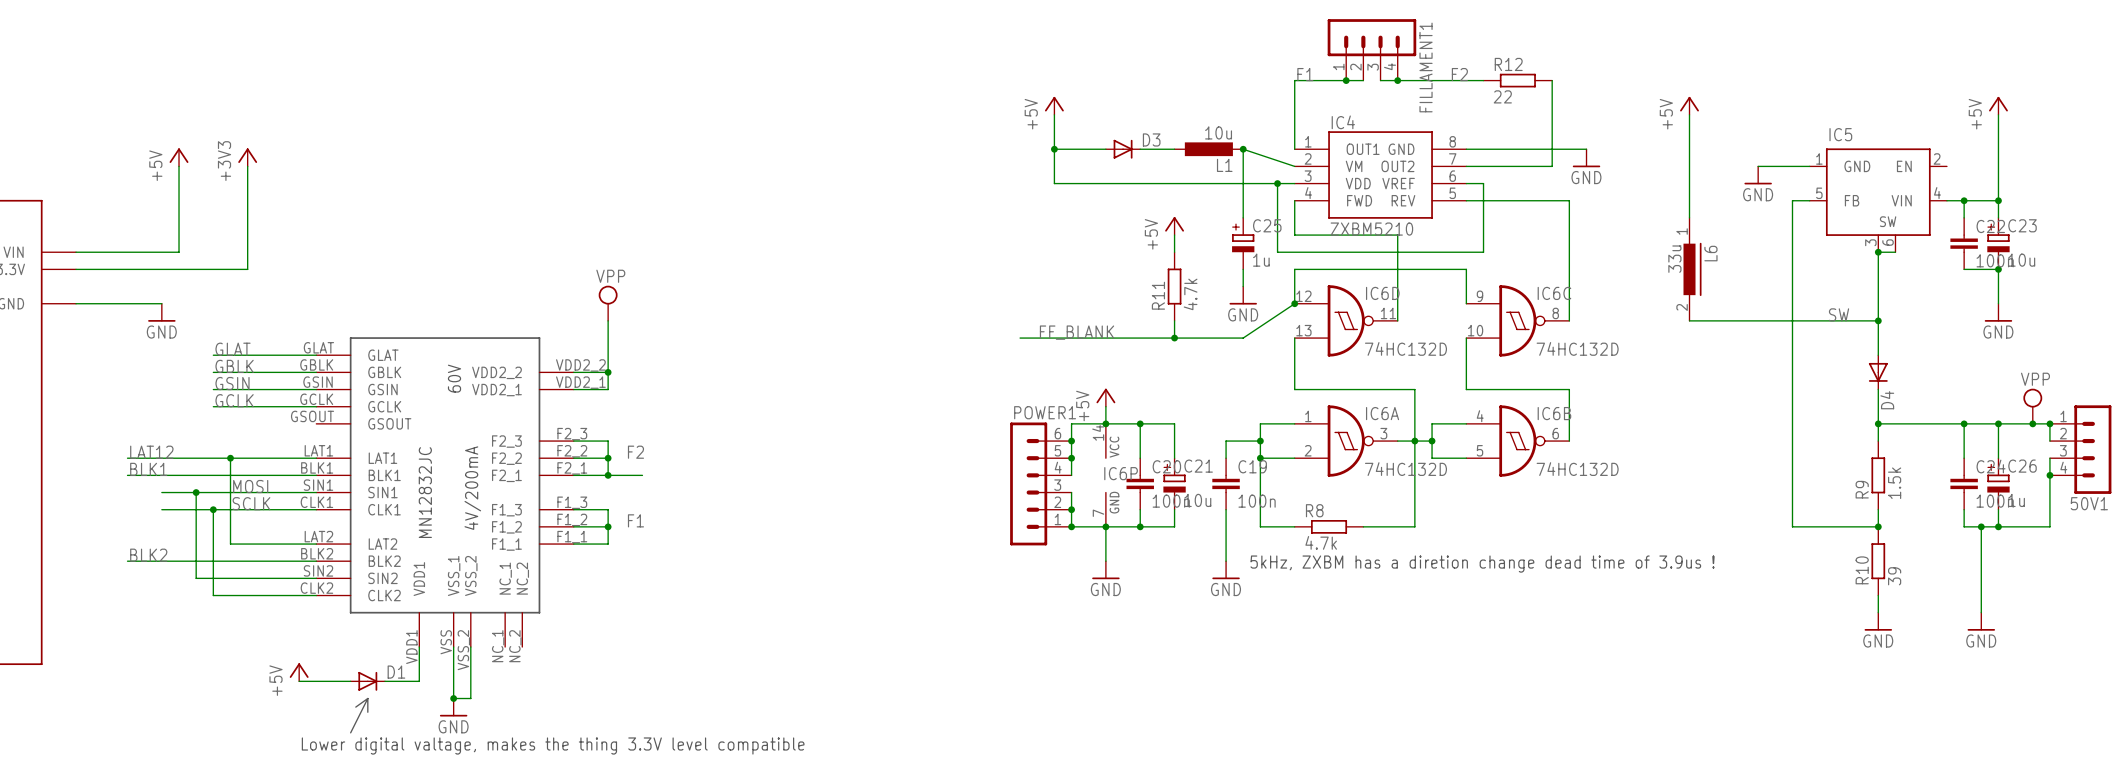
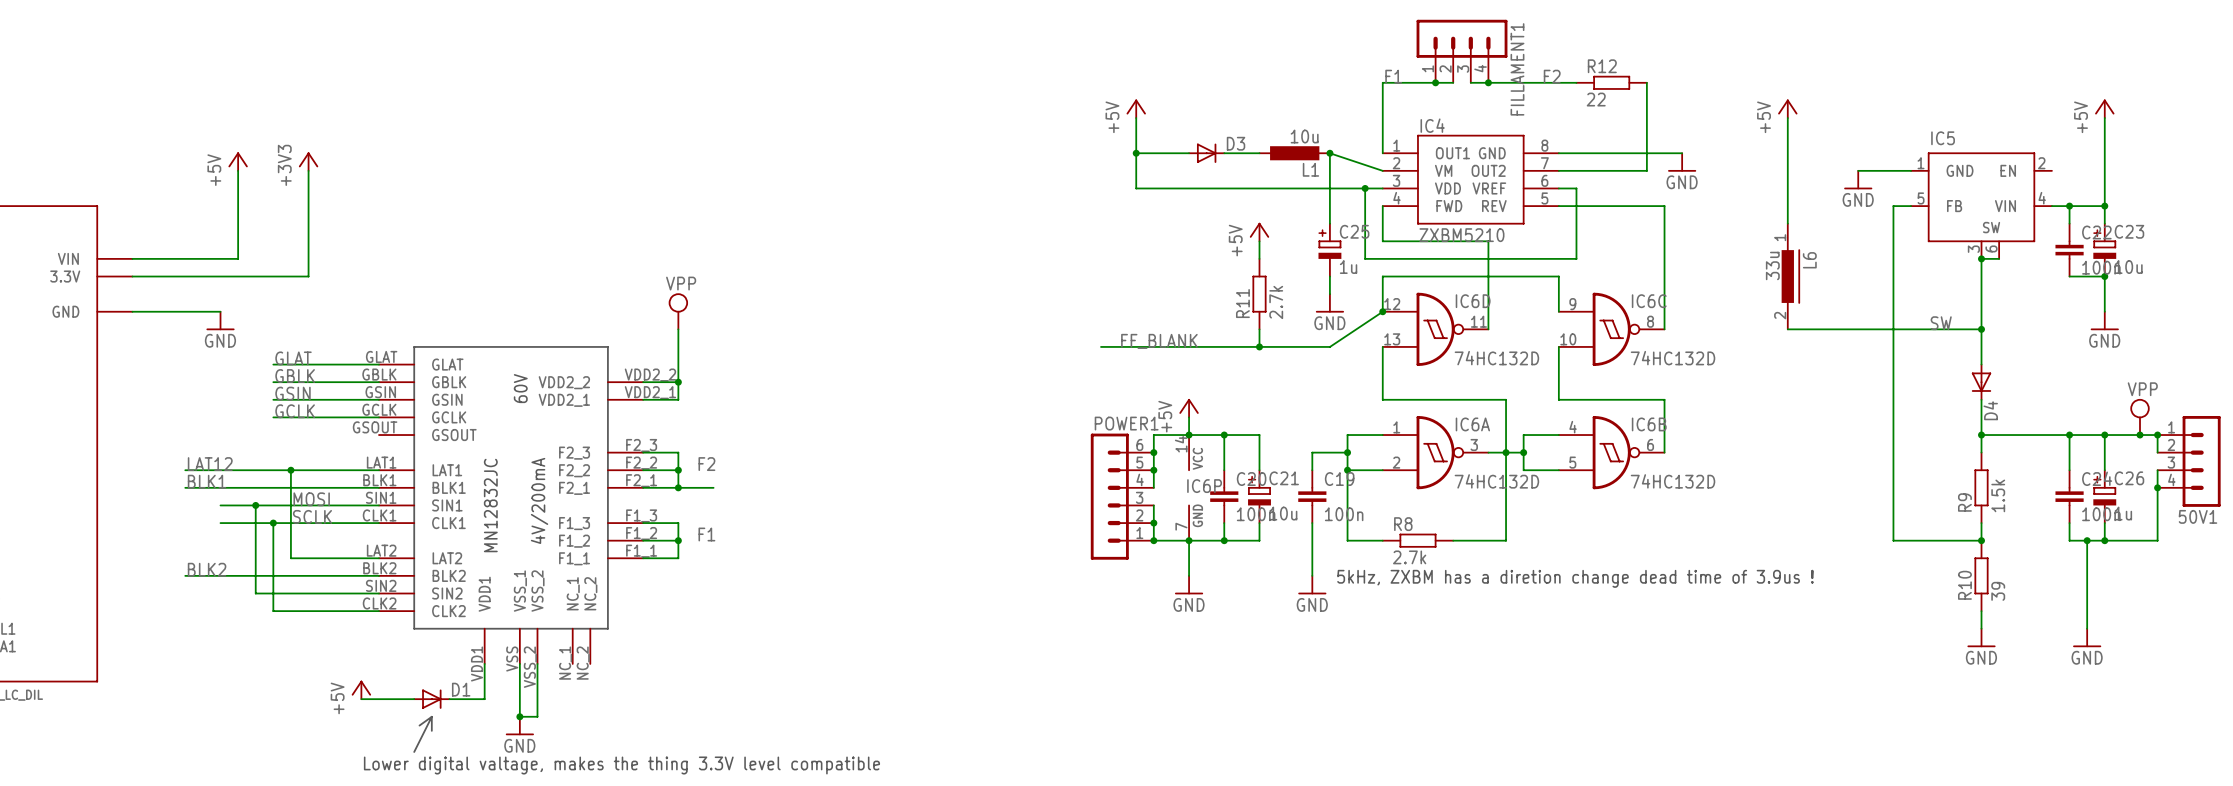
R11 value: 4.7k (1190, 294) -> 2.7k (1276, 302)
R8 value: 4.7k (1321, 542) -> 2.7k (1409, 557)

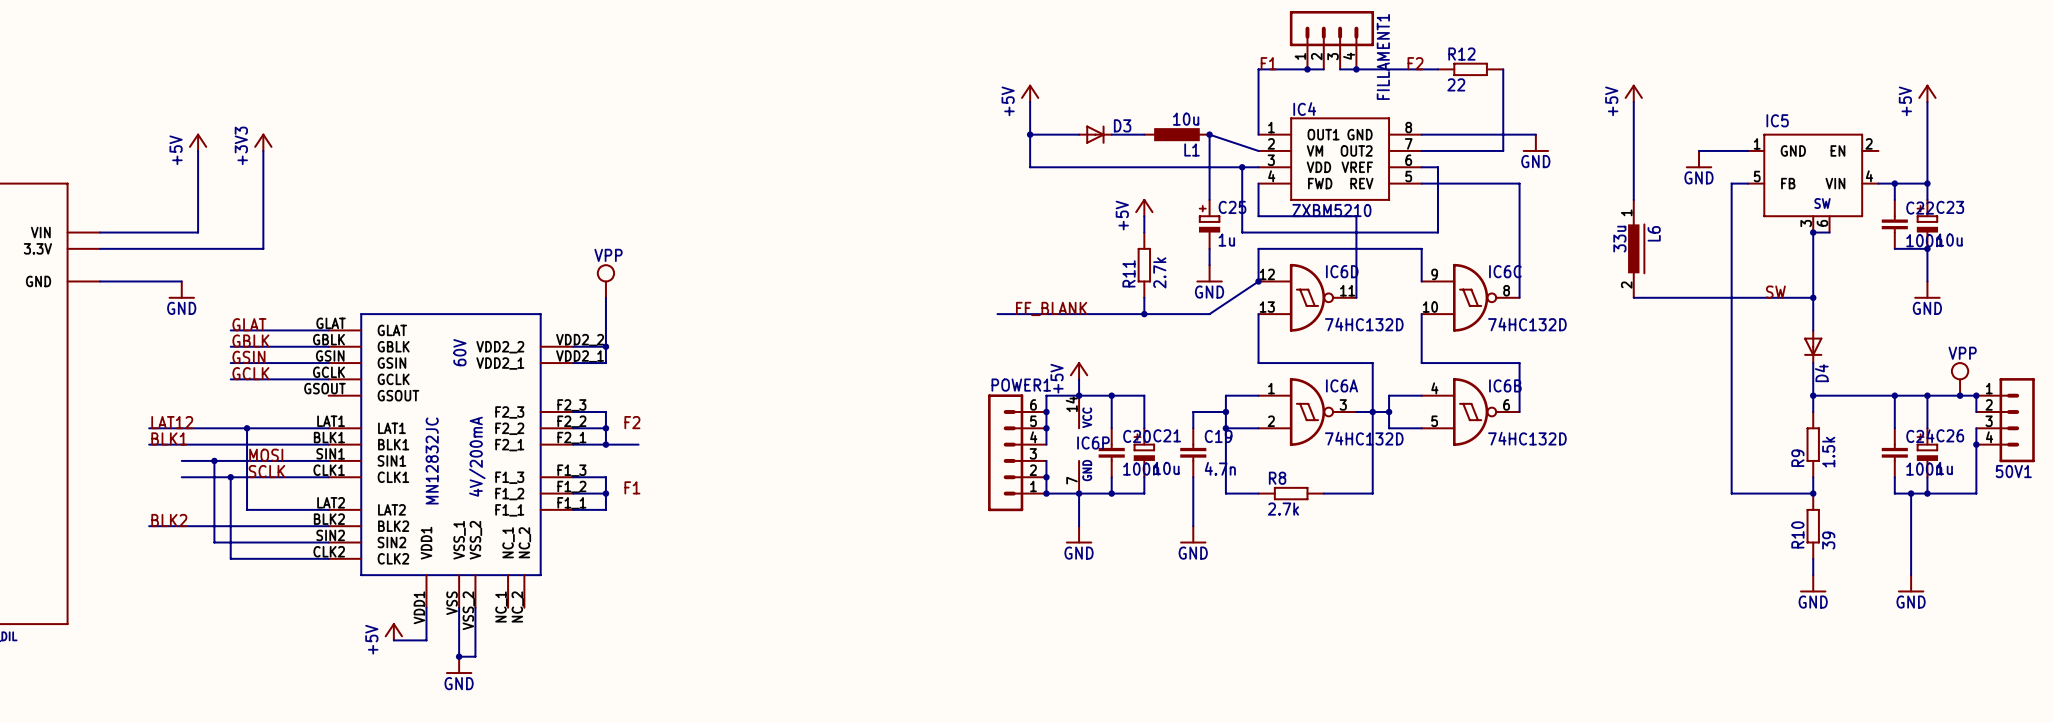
C19 value: 100n (1344, 514) -> 4.7n (1220, 468)
text: 5kHz, ZXBM has a diretion change dead time of 3.9us ! (1575, 578) -> none
power symbol position: +5V (361, 689) -> +5V (393, 631)
wire: (361, 699) (414, 699) -> none
D1: (431, 699) -> none
line: (431, 716) (414, 751) -> none
line: (431, 716) (431, 730) -> none
line: (431, 716) (419, 725) -> none
text: Lower digital valtage, makes the thing 3.3V level compatible (621, 765) -> none

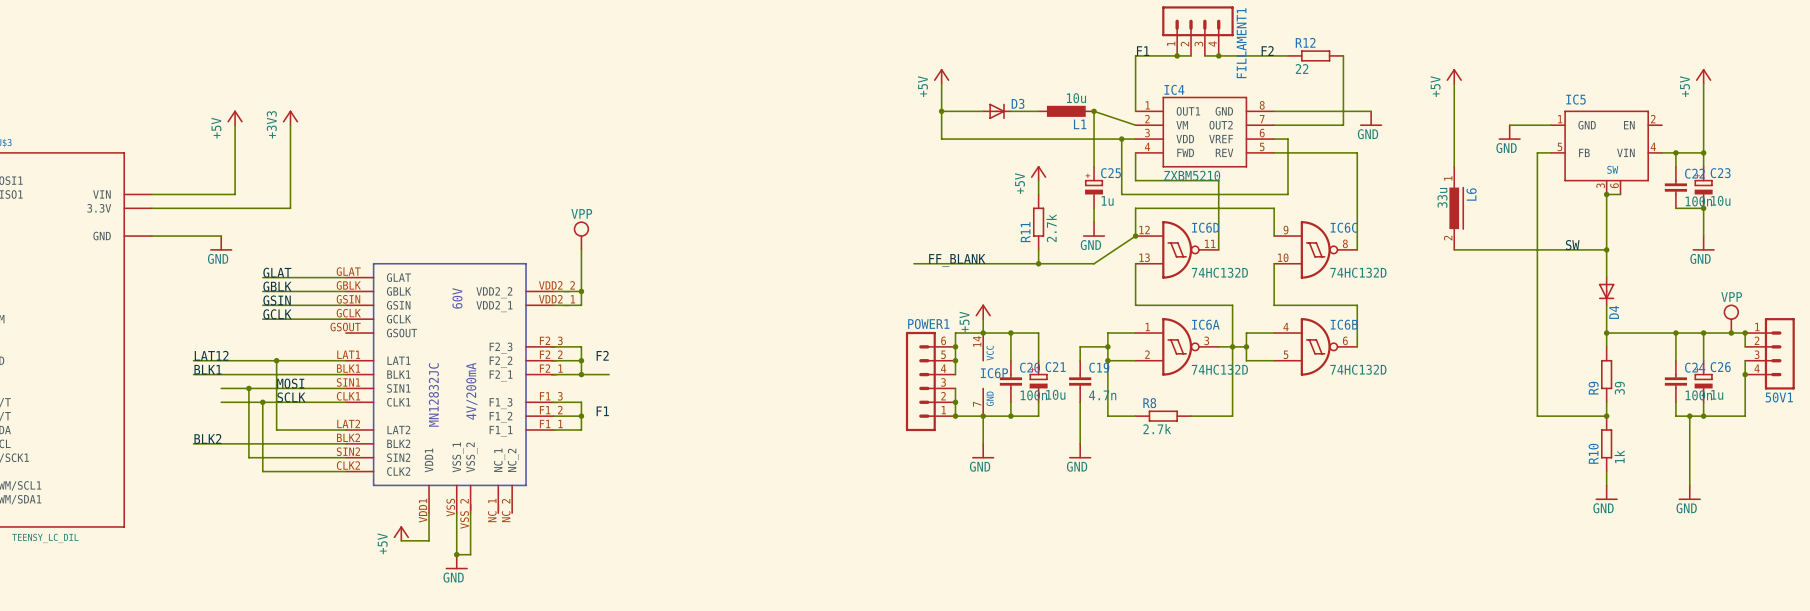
R9 value: 1.5k (1828, 452) -> 39 (1619, 388)
R10 value: 39 (1828, 540) -> 1k (1619, 456)

